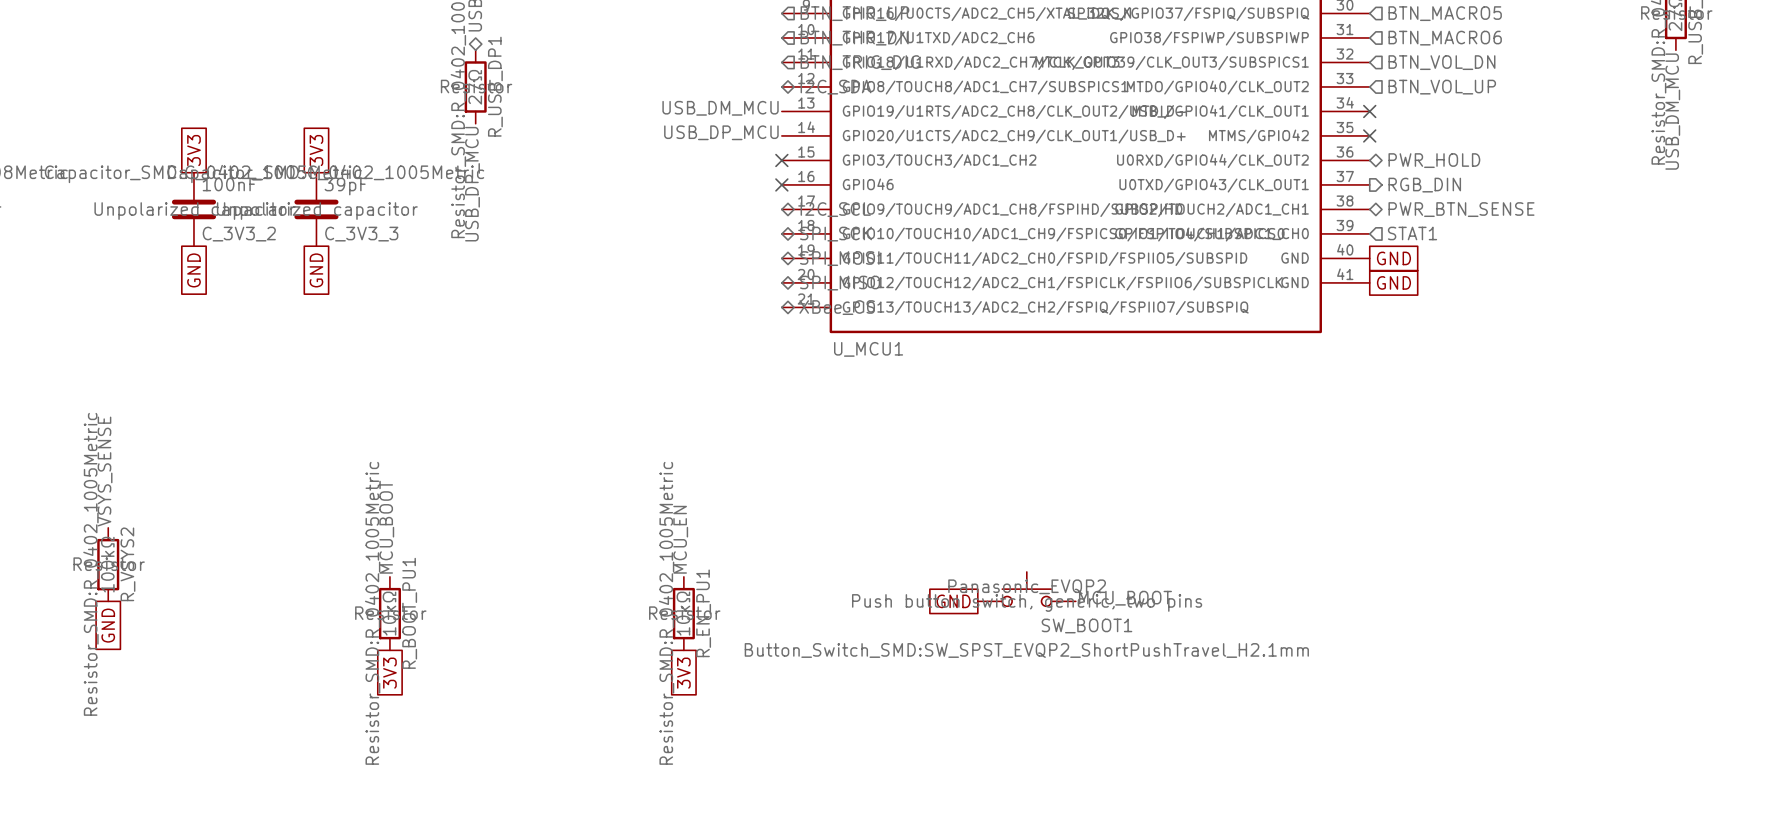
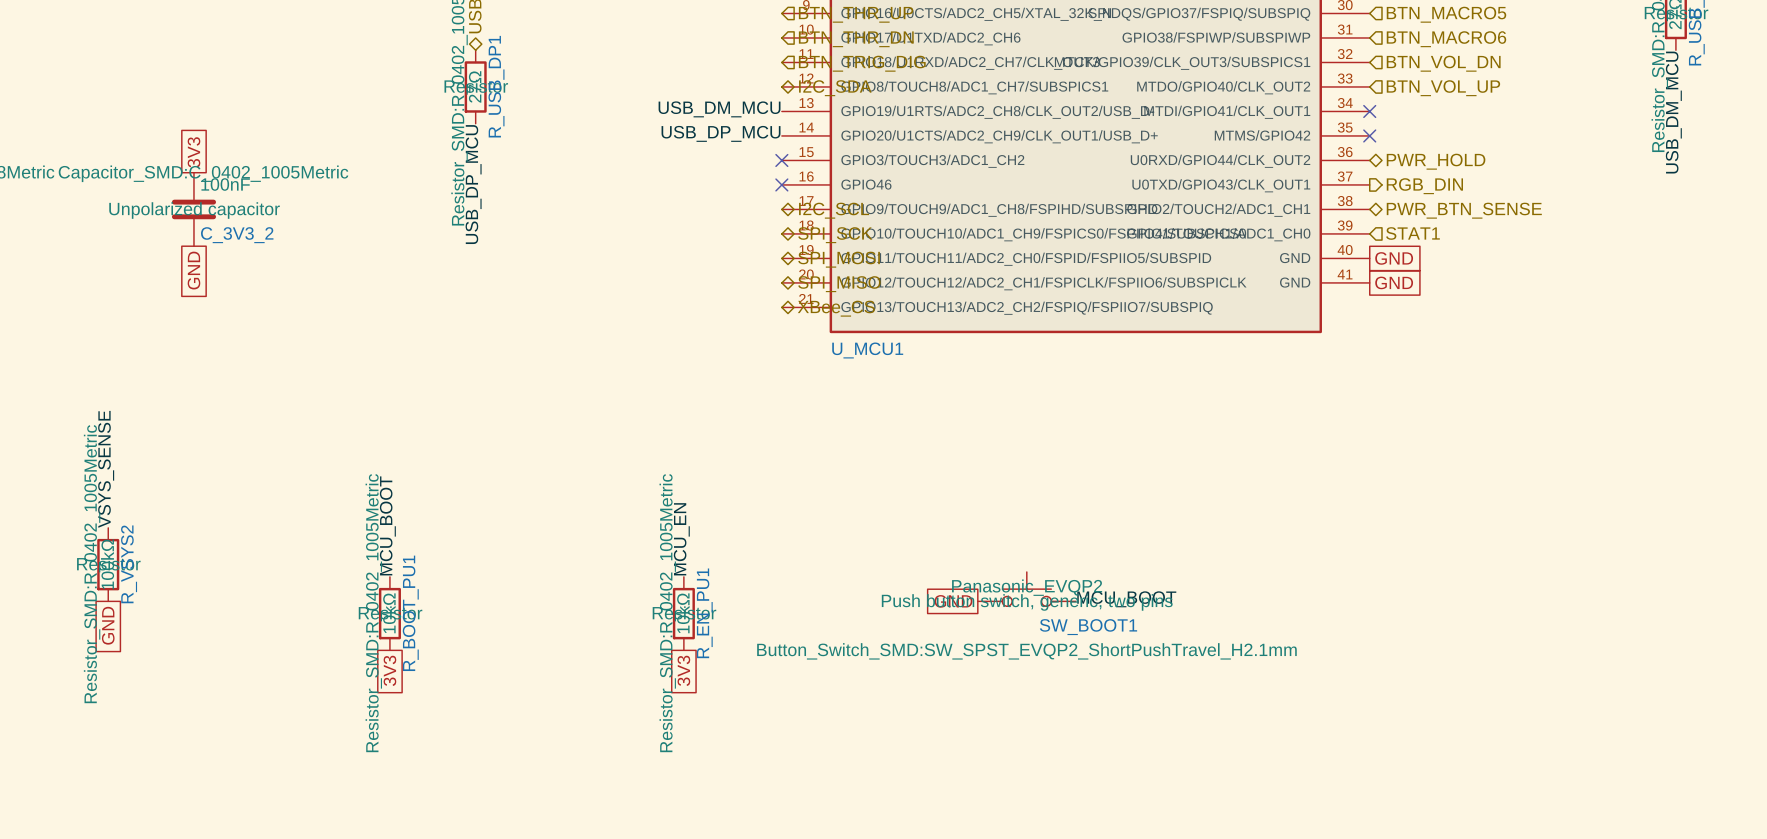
global label: 3V3 (316, 150) -> none
C_3V3_3: 39pF (316, 209) -> none
global label: GND (316, 270) -> none

